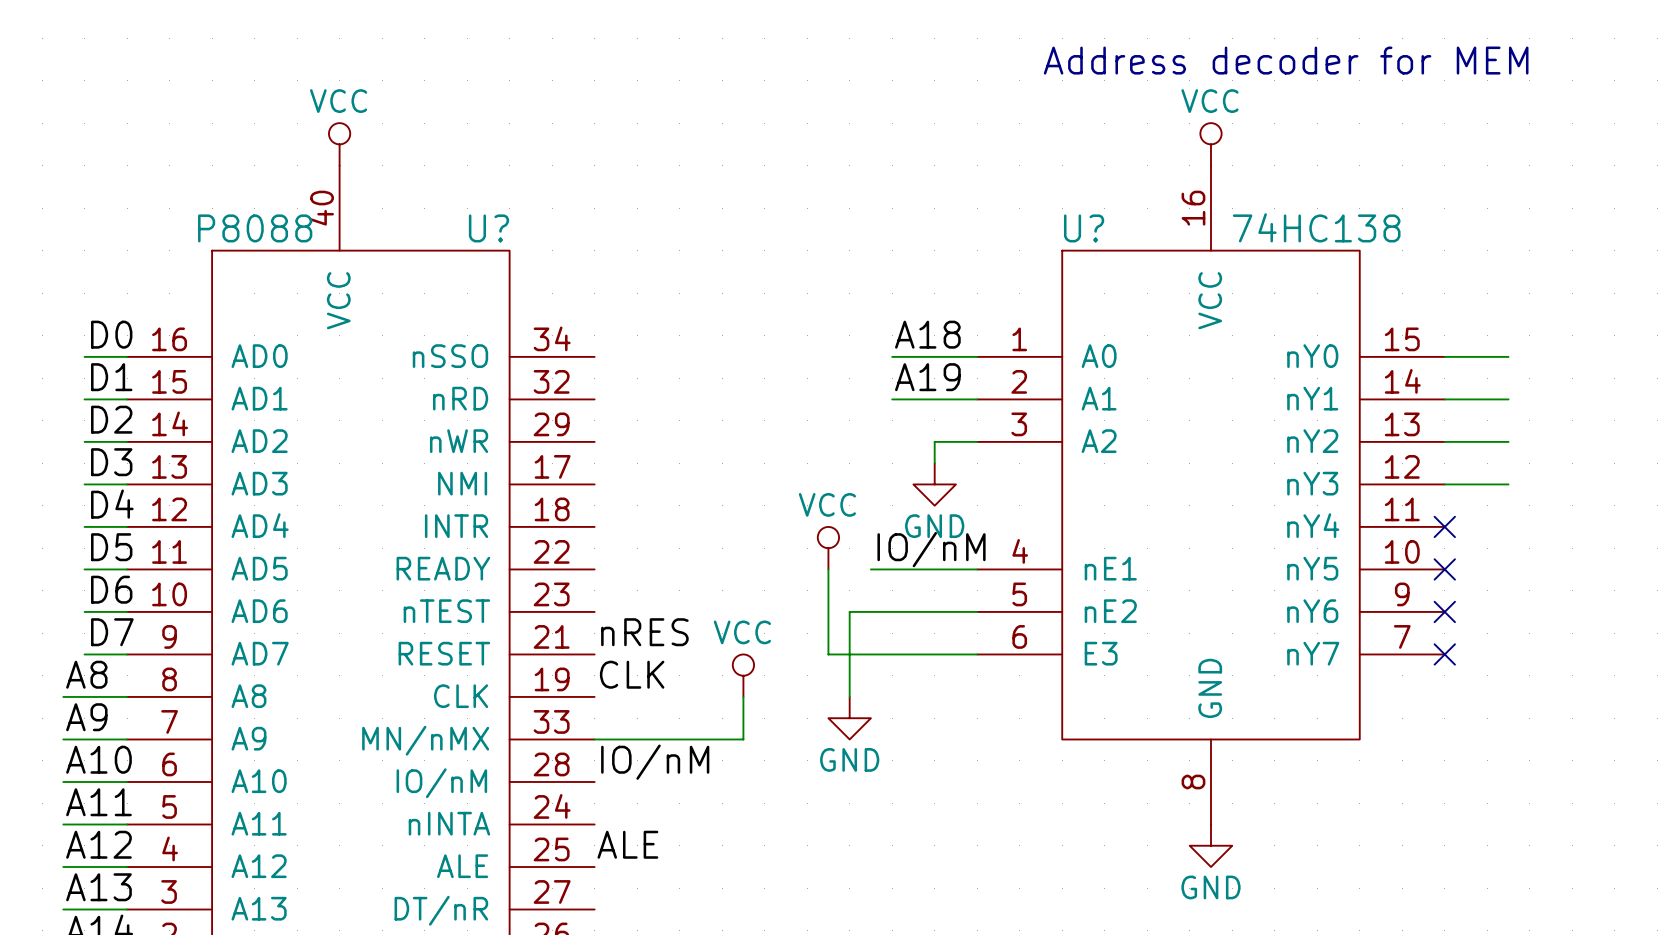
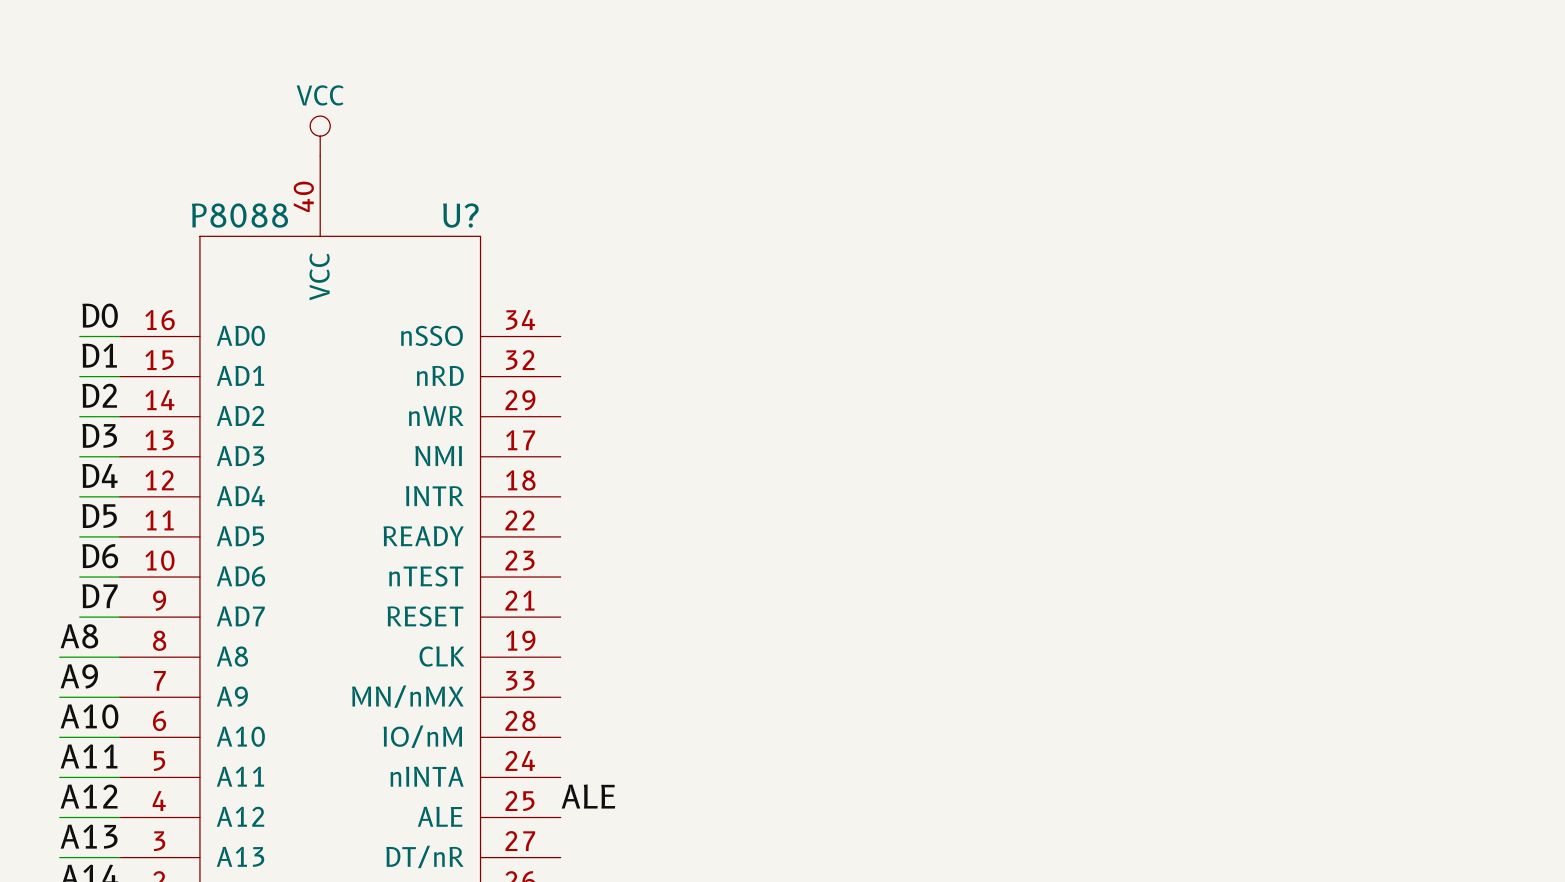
text: Address decoder for MEM (1286, 60) -> none
power symbol: VCC (1210, 144) -> none
label: A18 (927, 334) -> none
wire: (892, 356) (977, 356) -> none
wire: (1444, 356) (1508, 356) -> none
label: A19 (927, 377) -> none
wire: (892, 399) (977, 399) -> none
wire: (1444, 399) (1508, 399) -> none
wire: (977, 441) (934, 441) (934, 463) -> none
wire: (1444, 441) (1508, 441) -> none
power symbol: GND (934, 484) -> none
wire: (1444, 484) (1508, 484) -> none
U?: 74HC138 (1210, 495) -> none
no-connect mark: (1444, 526) -> none
power symbol: VCC (828, 548) -> none
label: IO/nM (931, 549) -> none
wire: (828, 569) (828, 654) (977, 654) -> none
wire: (870, 569) (977, 569) -> none
no-connect mark: (1444, 569) -> none
wire: (977, 611) (849, 611) (849, 696) -> none
no-connect mark: (1444, 611) -> none
label: nRES (644, 632) -> none
no-connect mark: (1444, 654) -> none
label: CLK (632, 674) -> none
power symbol: VCC (743, 675) -> none
wire: (743, 696) (743, 739) (594, 739) -> none
power symbol: GND (849, 718) -> none
label: IO/nM (655, 762) -> none
power symbol: GND (1210, 845) -> none

